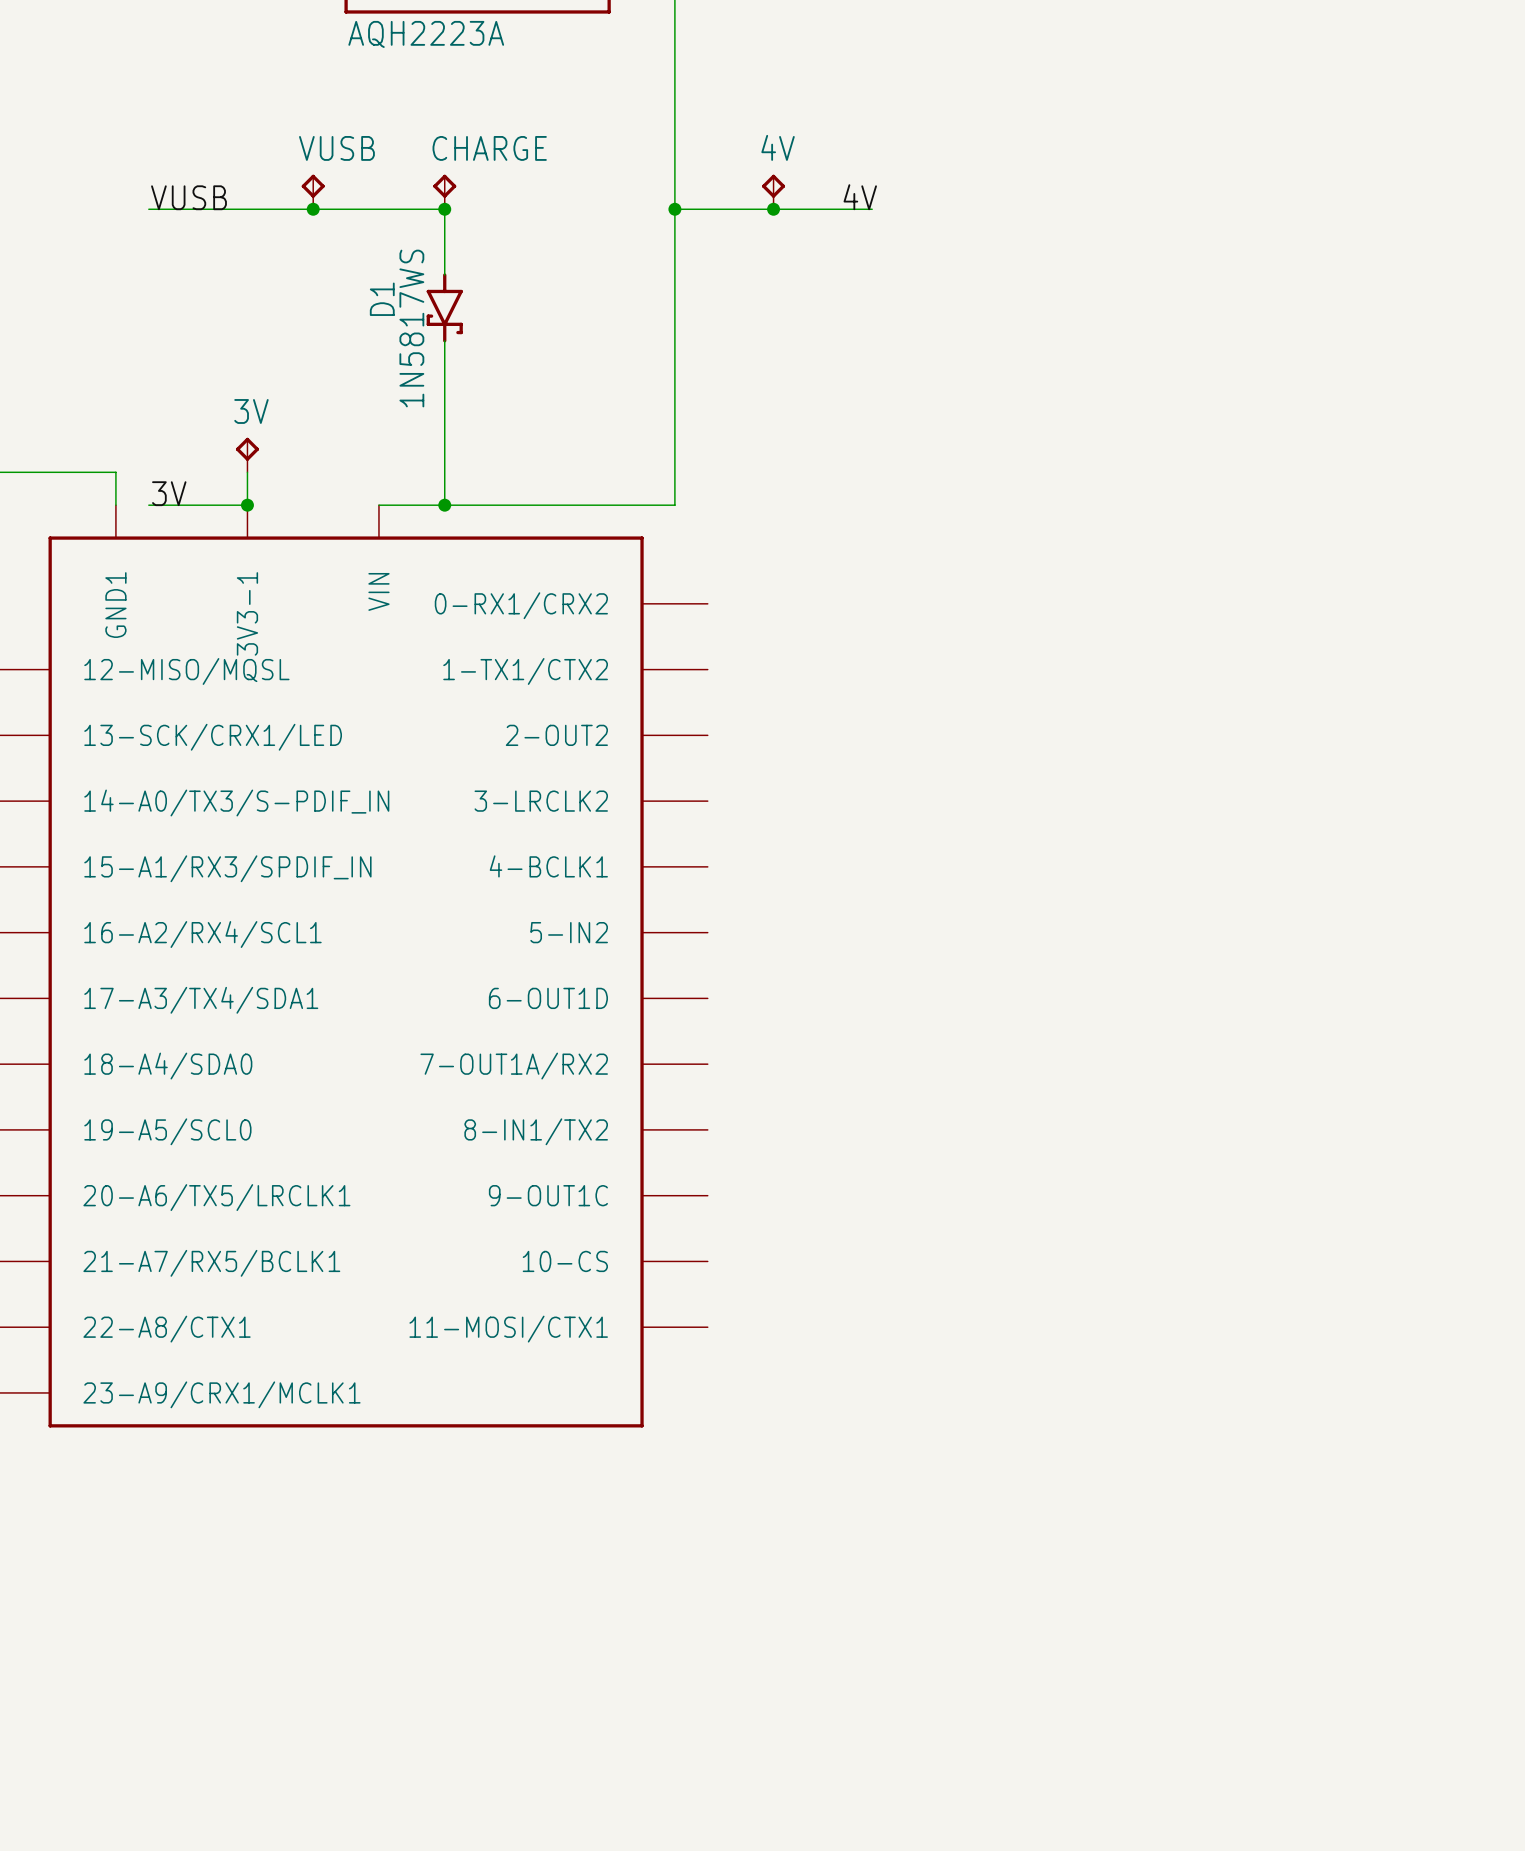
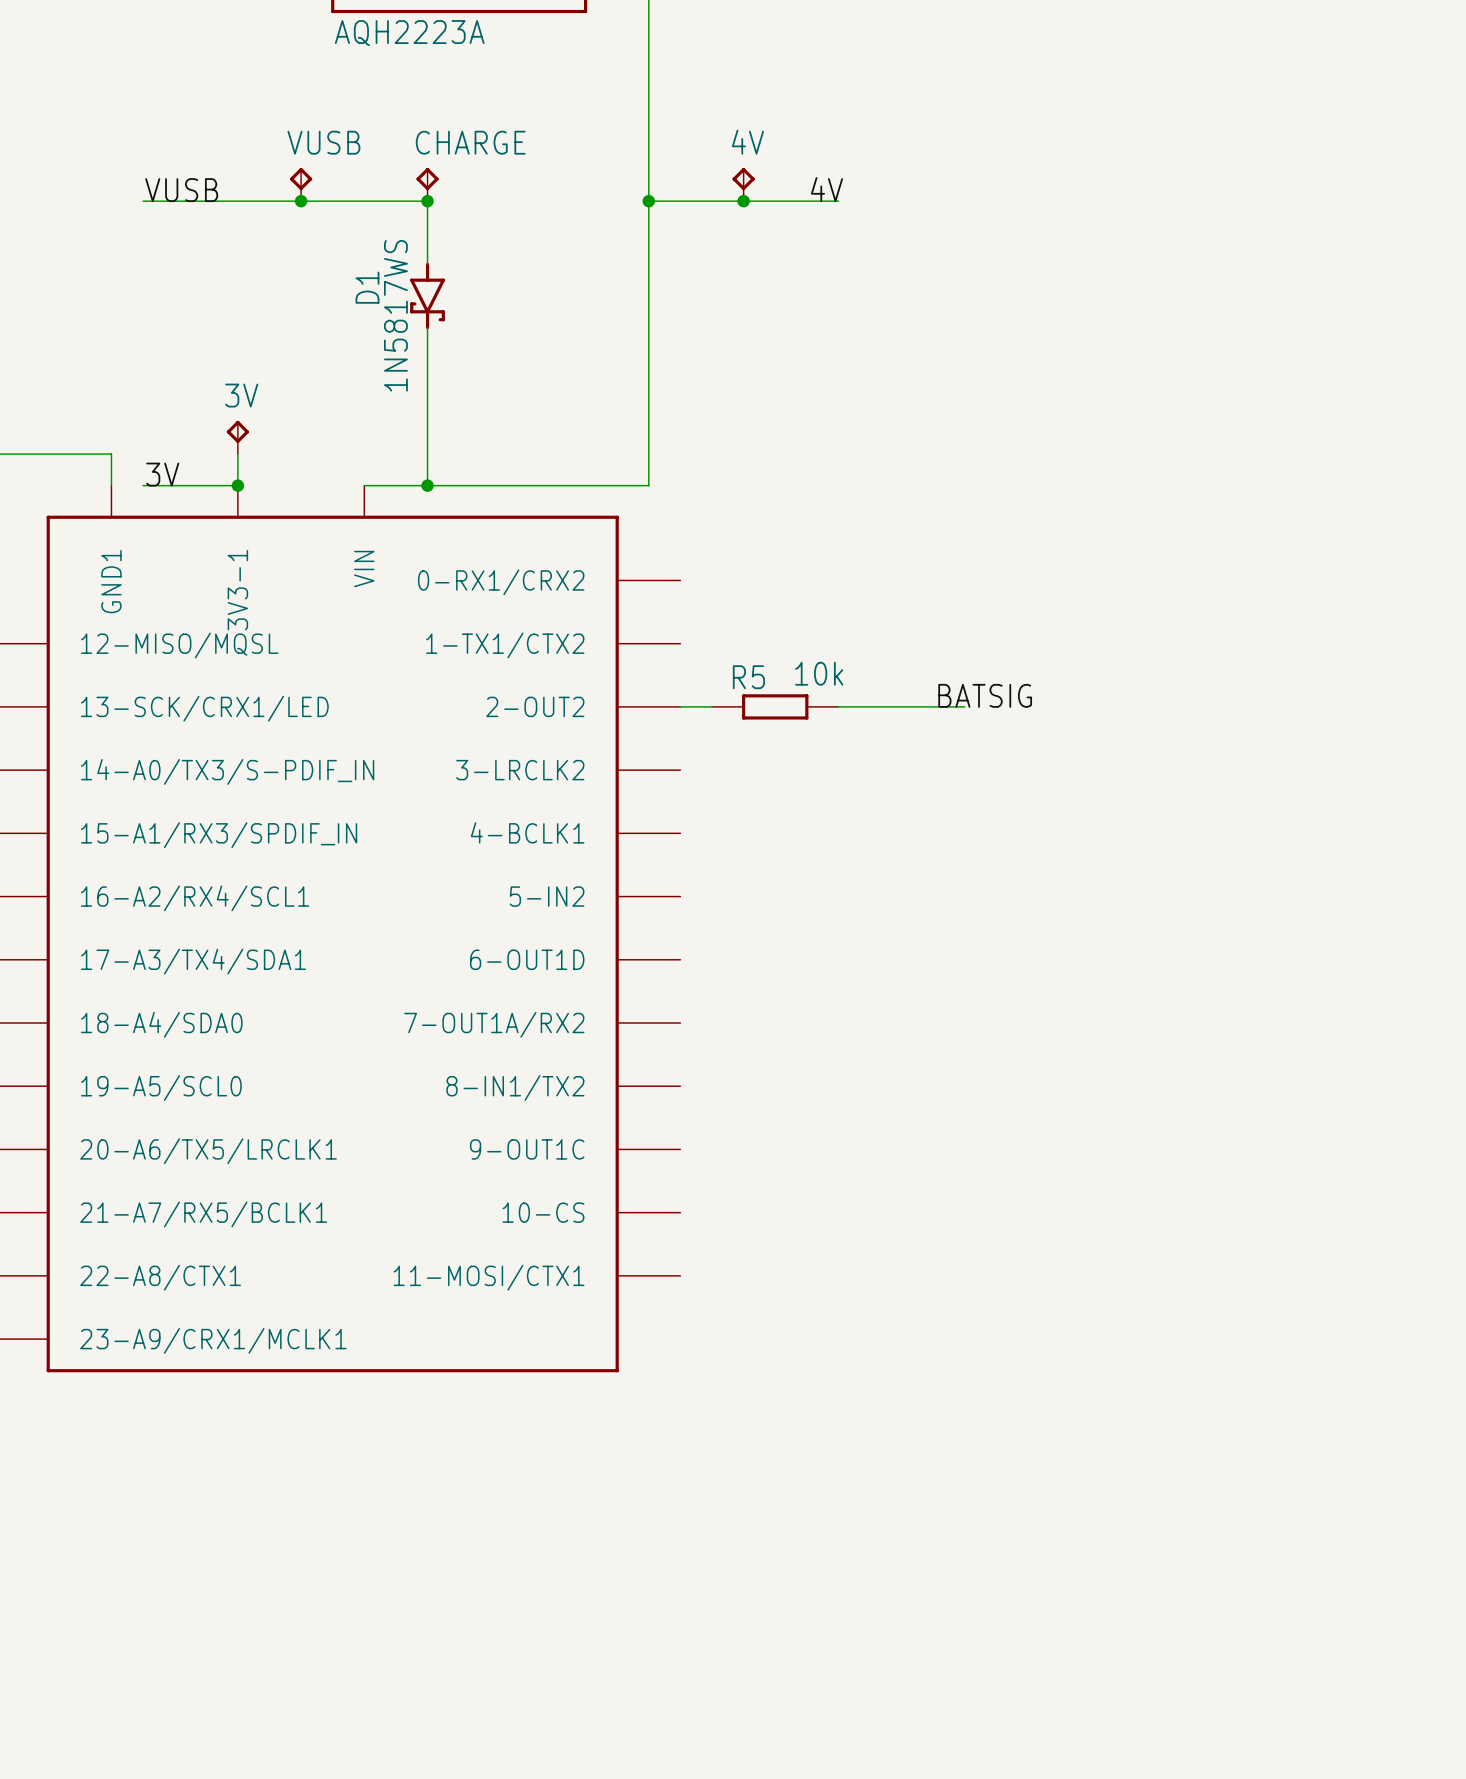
label: none -> BATSIG (985, 695)
wire: none -> (680, 706) (712, 706)
R5: none -> 10k (775, 706)
wire: none -> (838, 706) (964, 706)

